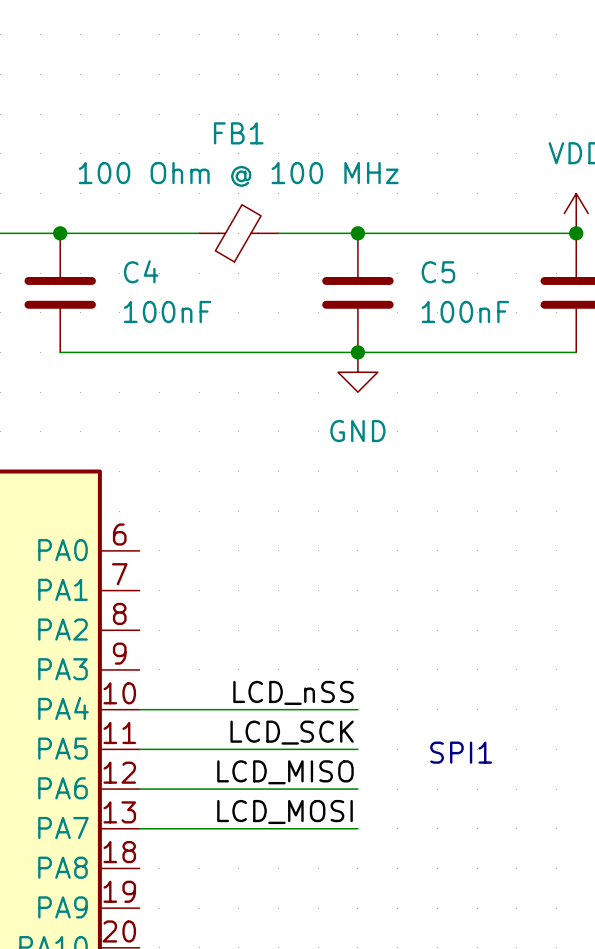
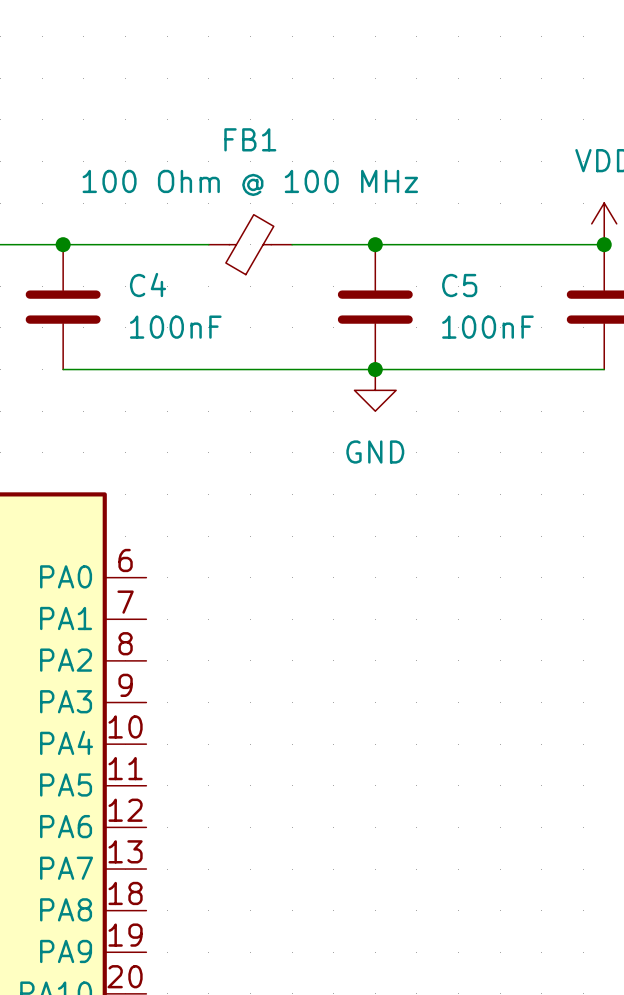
label: LCD_nSS (293, 692) -> none
wire: (139, 709) (357, 709) -> none
label: LCD_SCK (292, 732) -> none
wire: (139, 749) (357, 749) -> none
text: SPI1 (461, 752) -> none
label: LCD_MISO (285, 772) -> none
wire: (139, 789) (357, 789) -> none
label: LCD_MOSI (285, 811) -> none
wire: (139, 828) (357, 828) -> none

